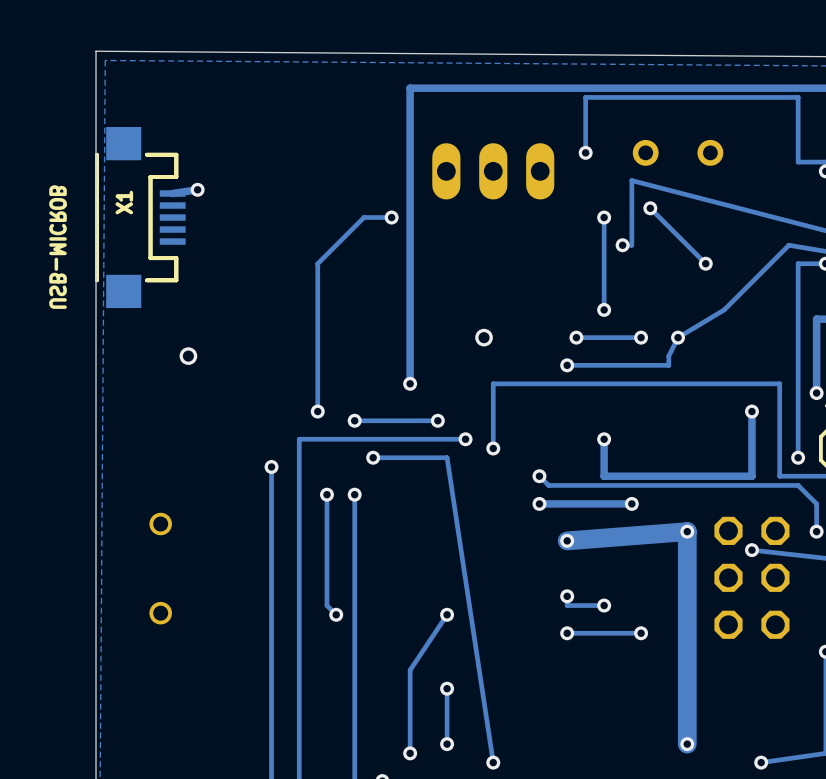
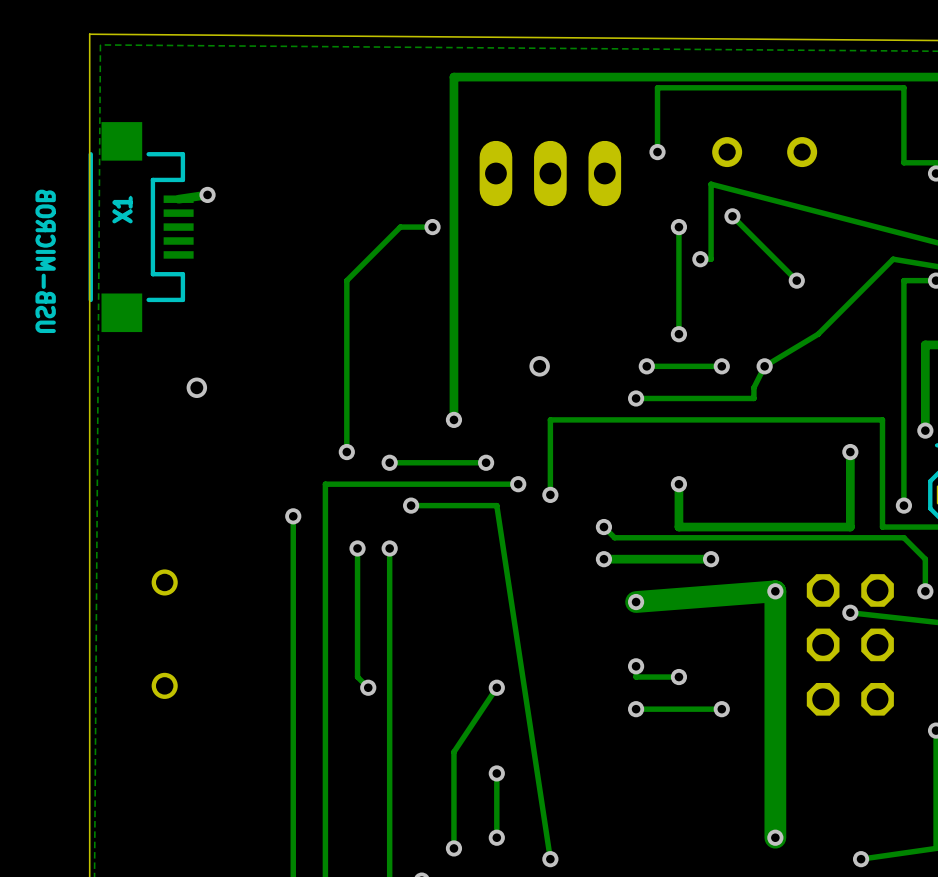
line: (96, 154) (96, 280) -> none
line: (146, 154) (176, 154) (176, 176) (150, 176) (150, 258) (176, 258) (176, 280) (146, 280) -> none

